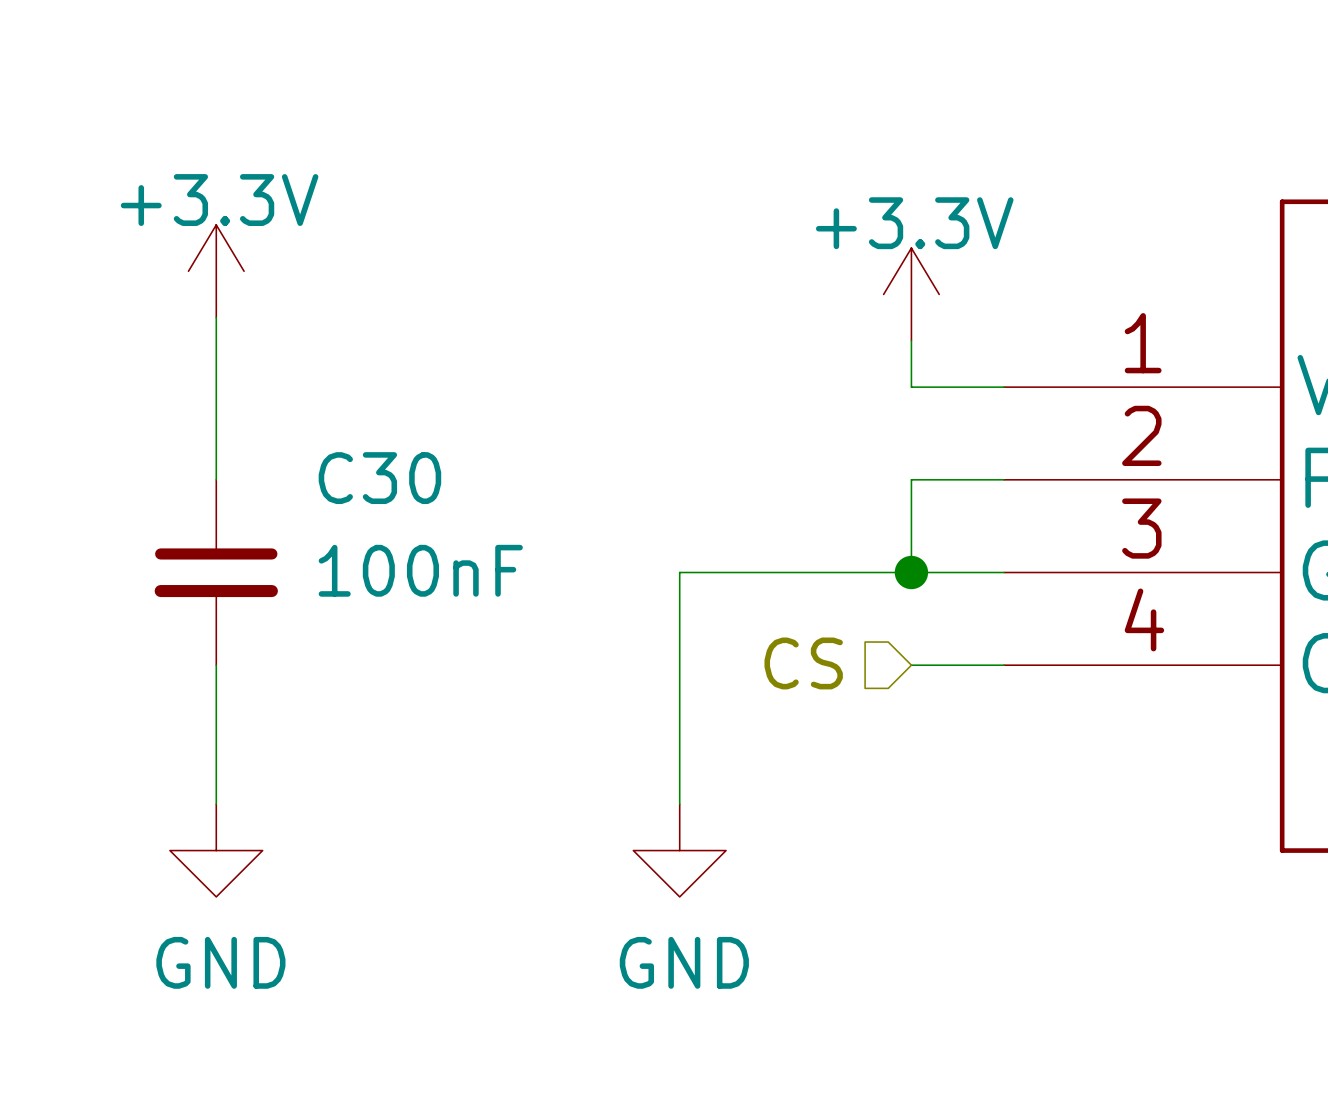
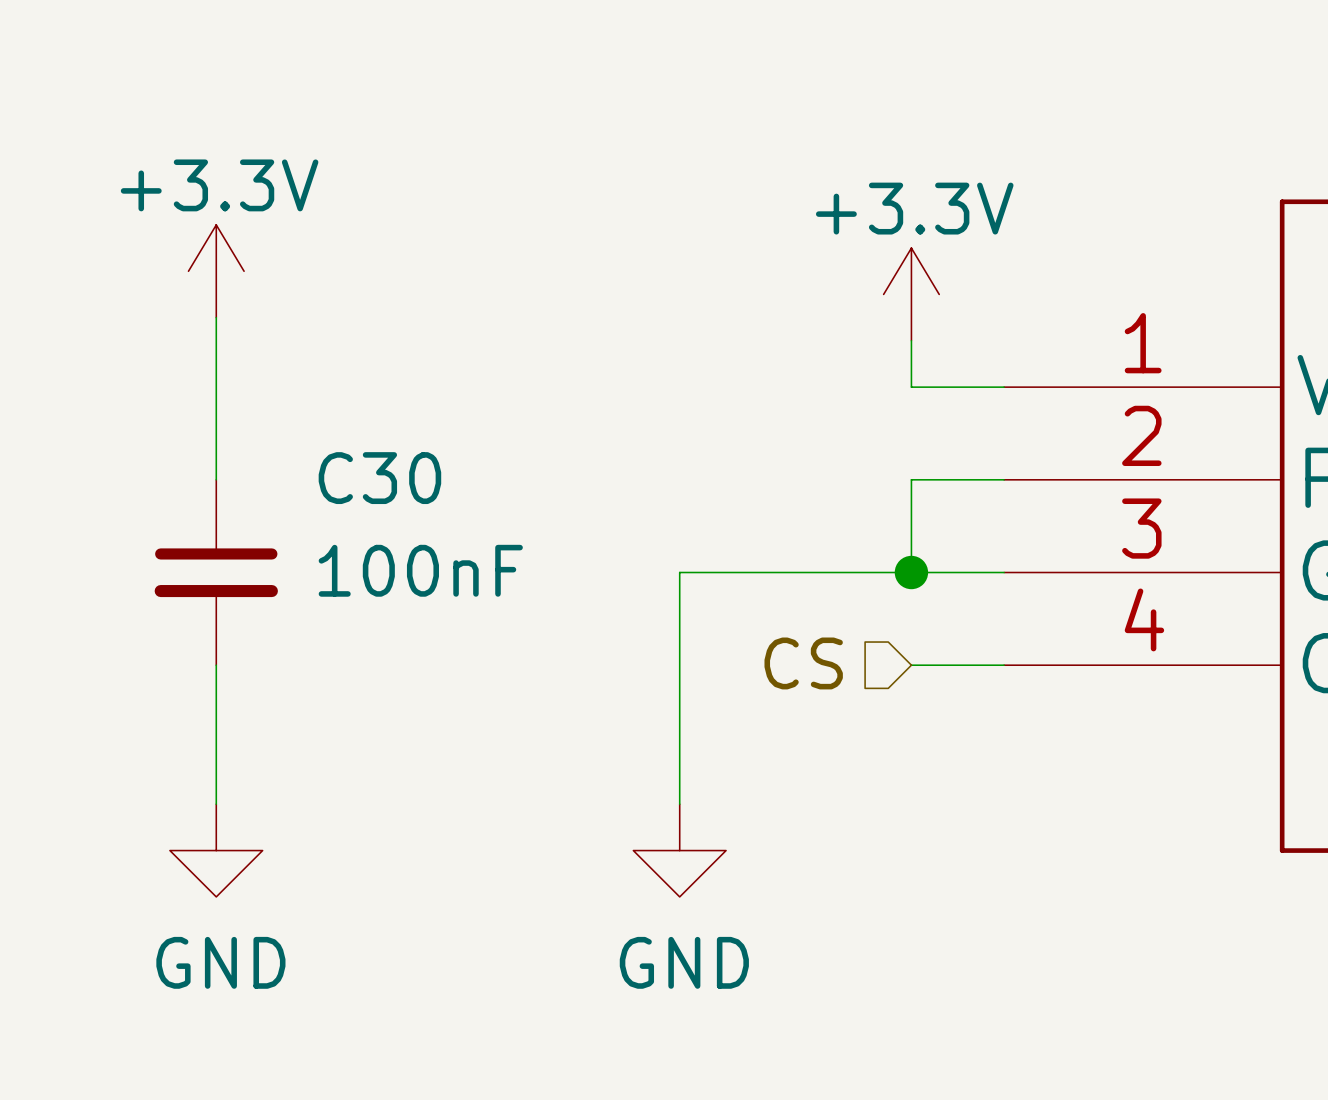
power symbol text position: +3.3V (219, 200) -> +3.3V (219, 185)
power symbol text position: +3.3V (914, 223) -> +3.3V (914, 208)

